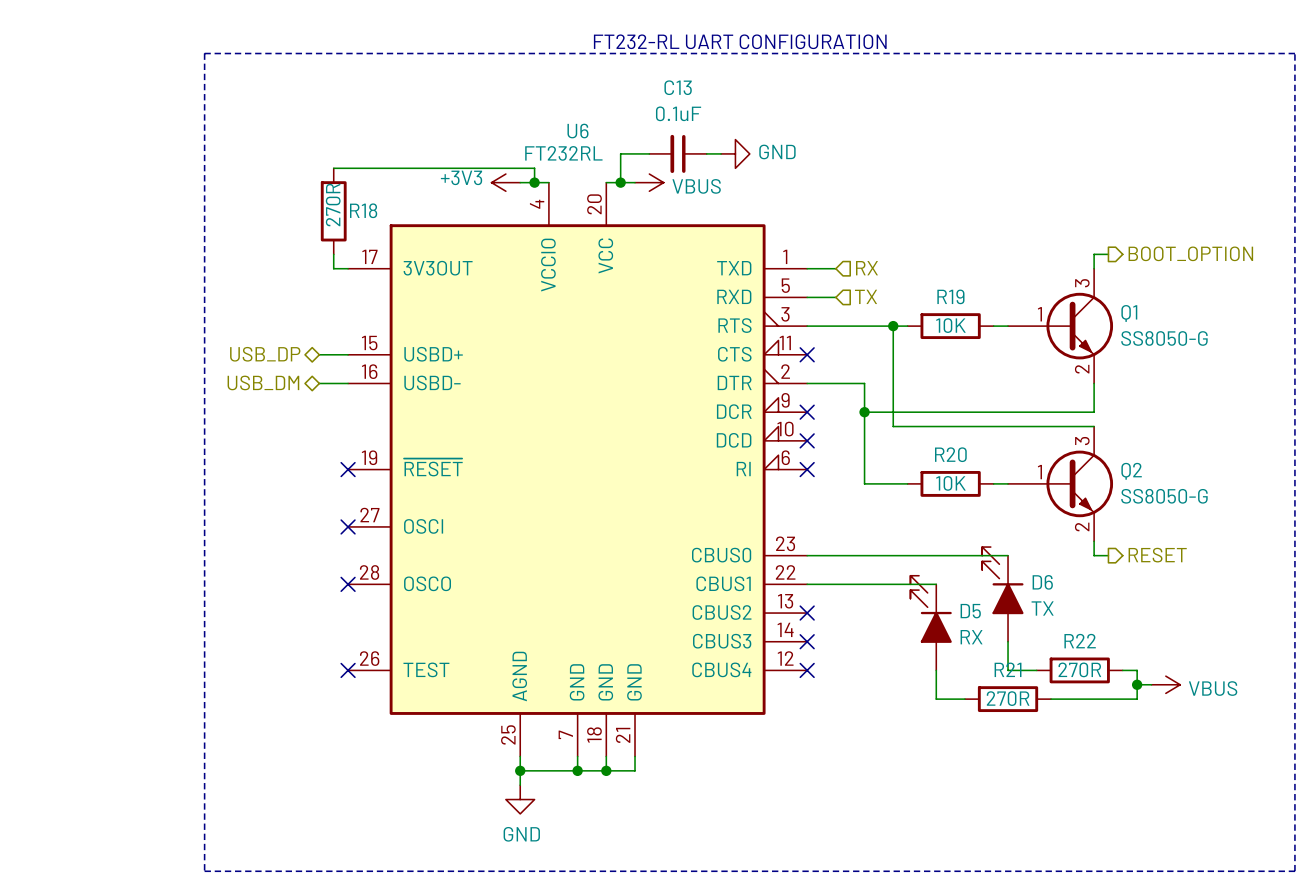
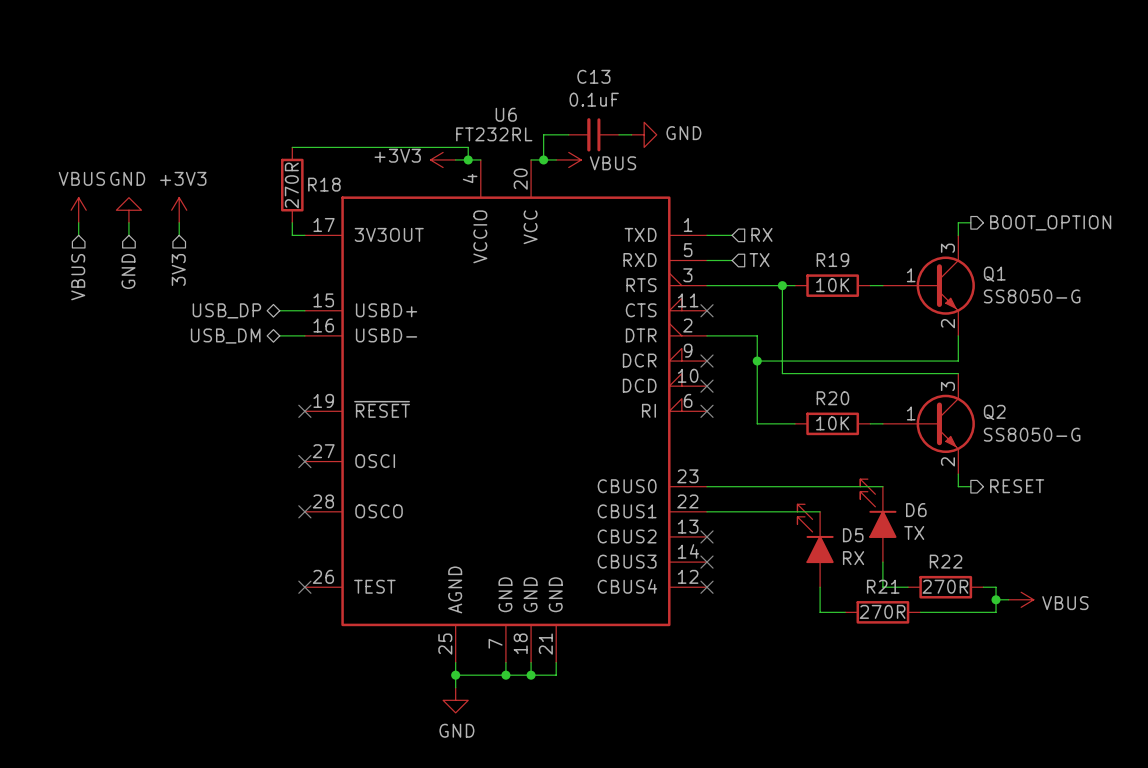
text: FT232-RL UART CONFIGURATION (740, 41) -> none
line: (204, 53) (1294, 53) (1294, 871) (204, 871) (204, 53) -> none
power symbol: none -> VBUS (78, 210)
power symbol: none -> GND (128, 210)
power symbol: none -> +3V3 (179, 210)
wire: none -> (78, 222) (78, 235)
wire: none -> (128, 222) (128, 235)
hierarchical label: none -> 3V3 (178, 269)
hierarchical label: none -> GND (128, 271)
hierarchical label: none -> VBUS (78, 277)

